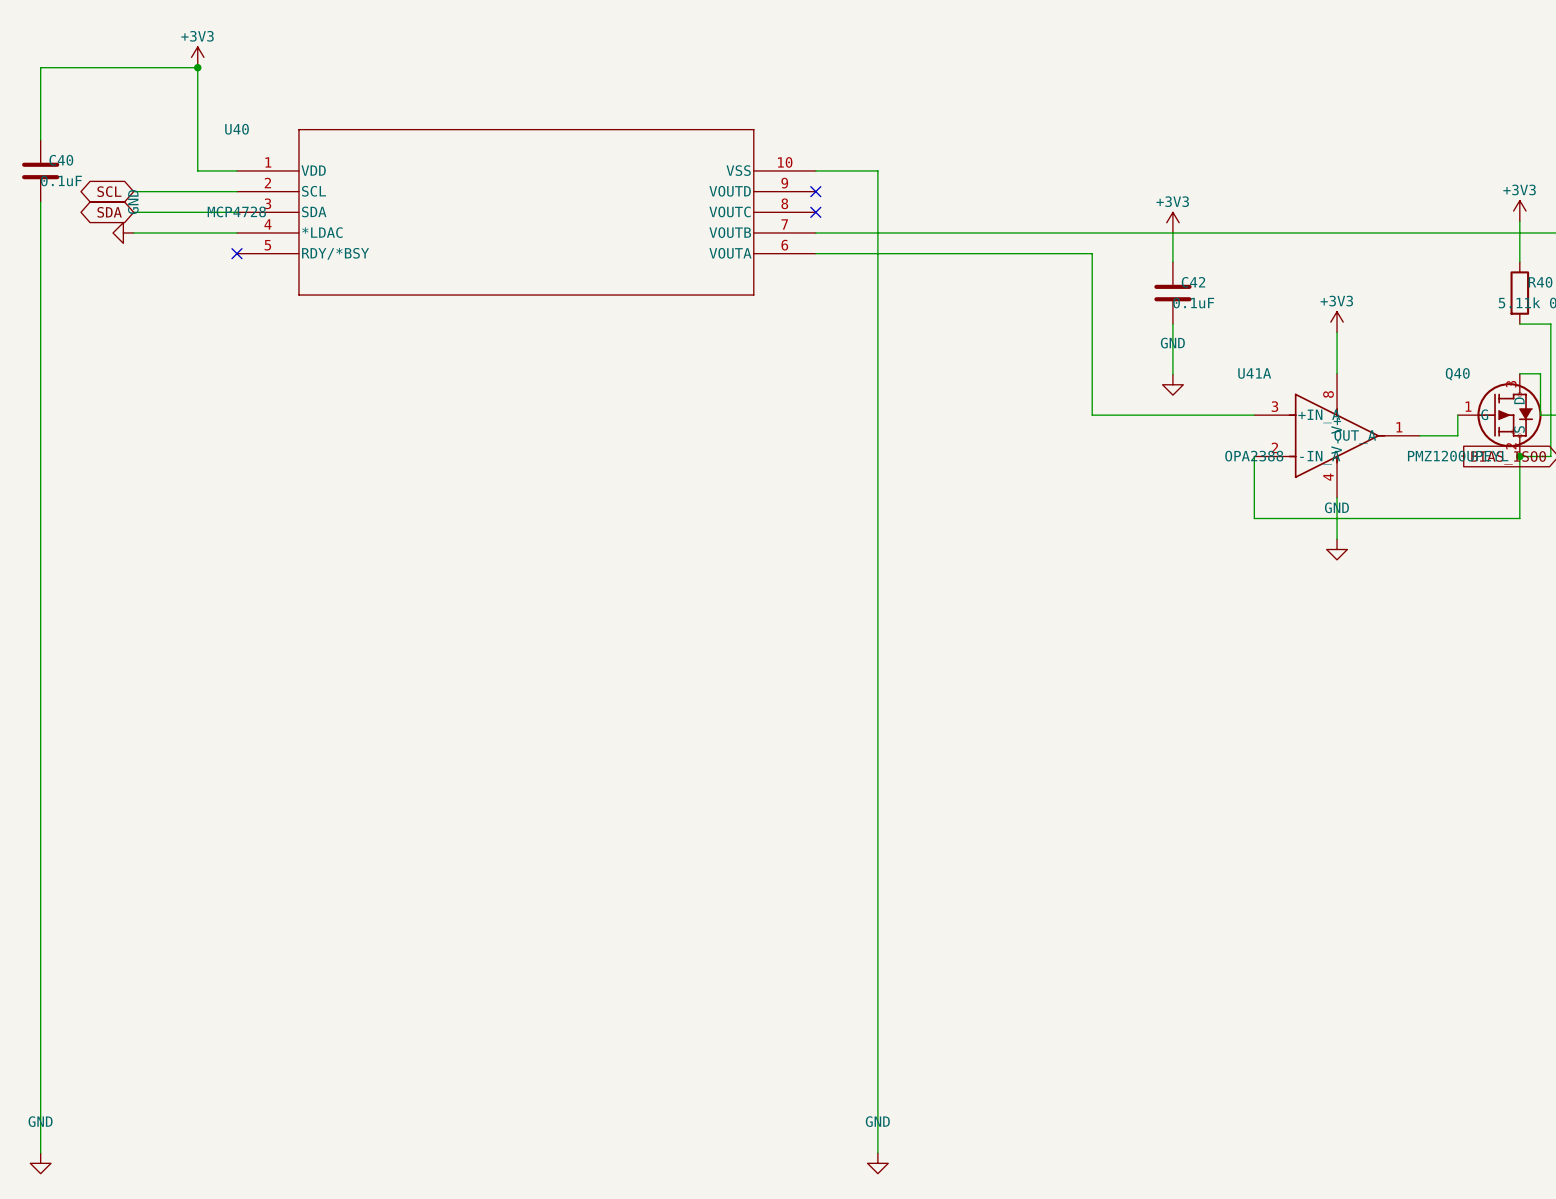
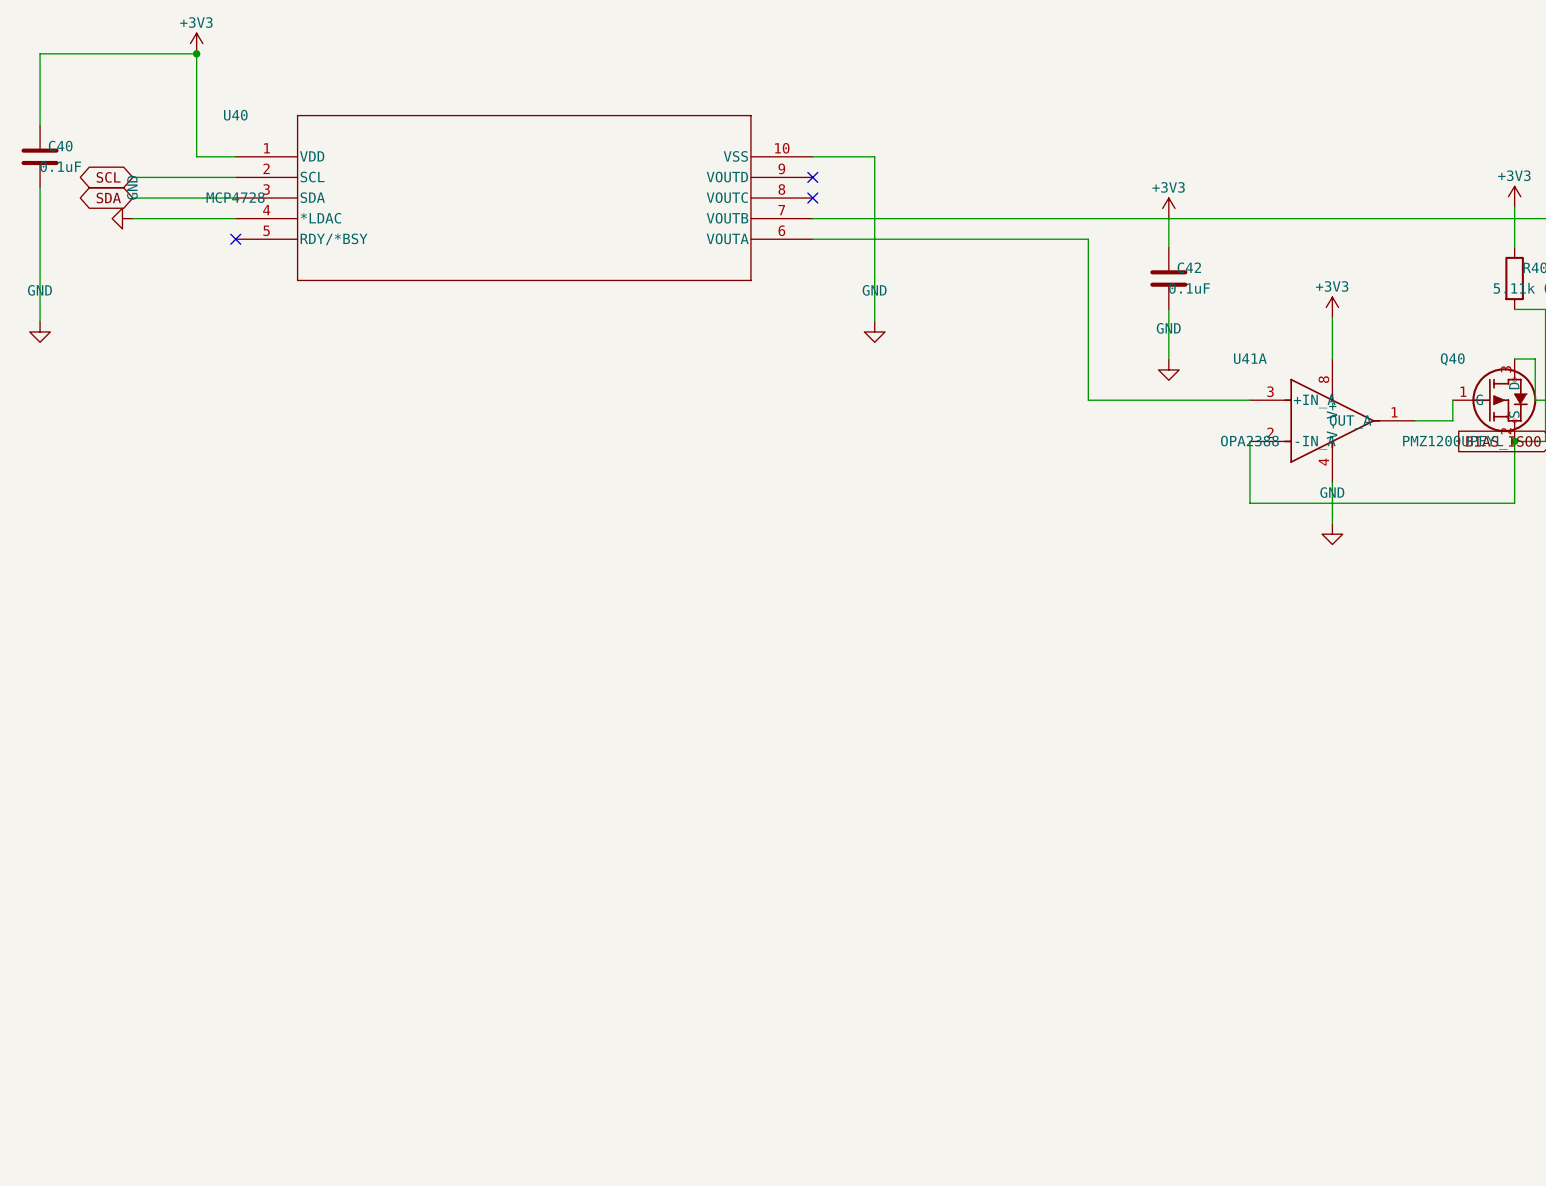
wire: (40, 336) (40, 1153) -> none
wire: (877, 336) (877, 1153) -> none
power symbol: none -> GND (40, 331)
power symbol: none -> GND (874, 331)
power symbol: GND (40, 1163) -> none
power symbol: GND (877, 1163) -> none

